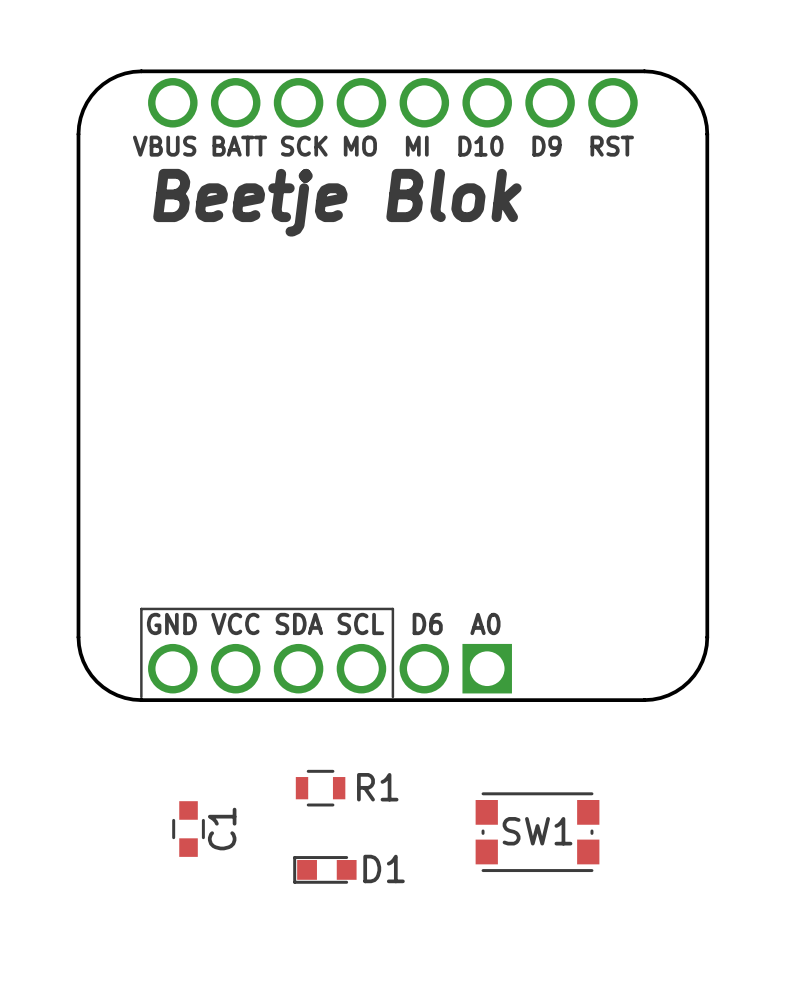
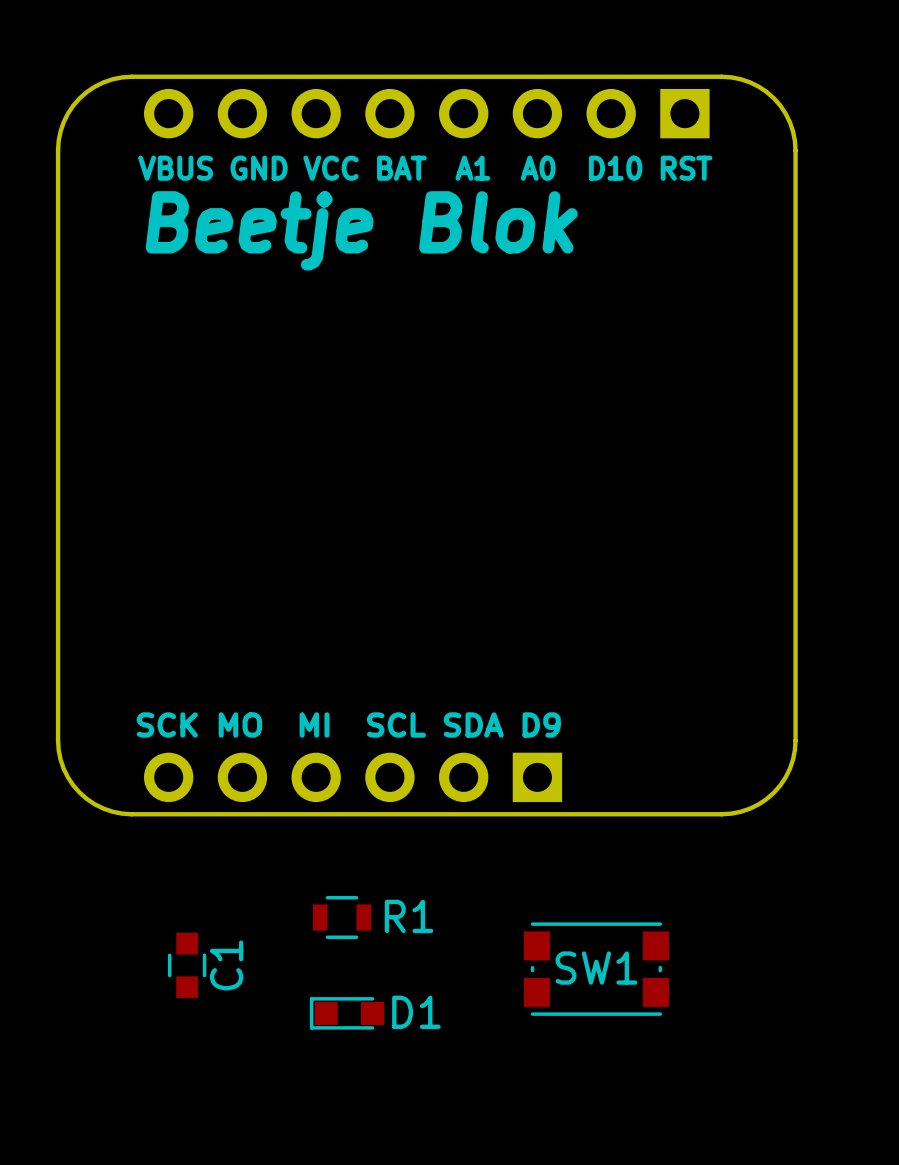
part footprint: [148, 78, 638, 128] -> [144, 88, 710, 139]
text: none -> VBUS GND VCC BAT A1 A0 D10 RST (425, 168)
part footprint: [140, 607, 512, 699] -> [144, 752, 563, 803]
text: none -> SCK MO MI SCL SDA D9 (348, 724)

